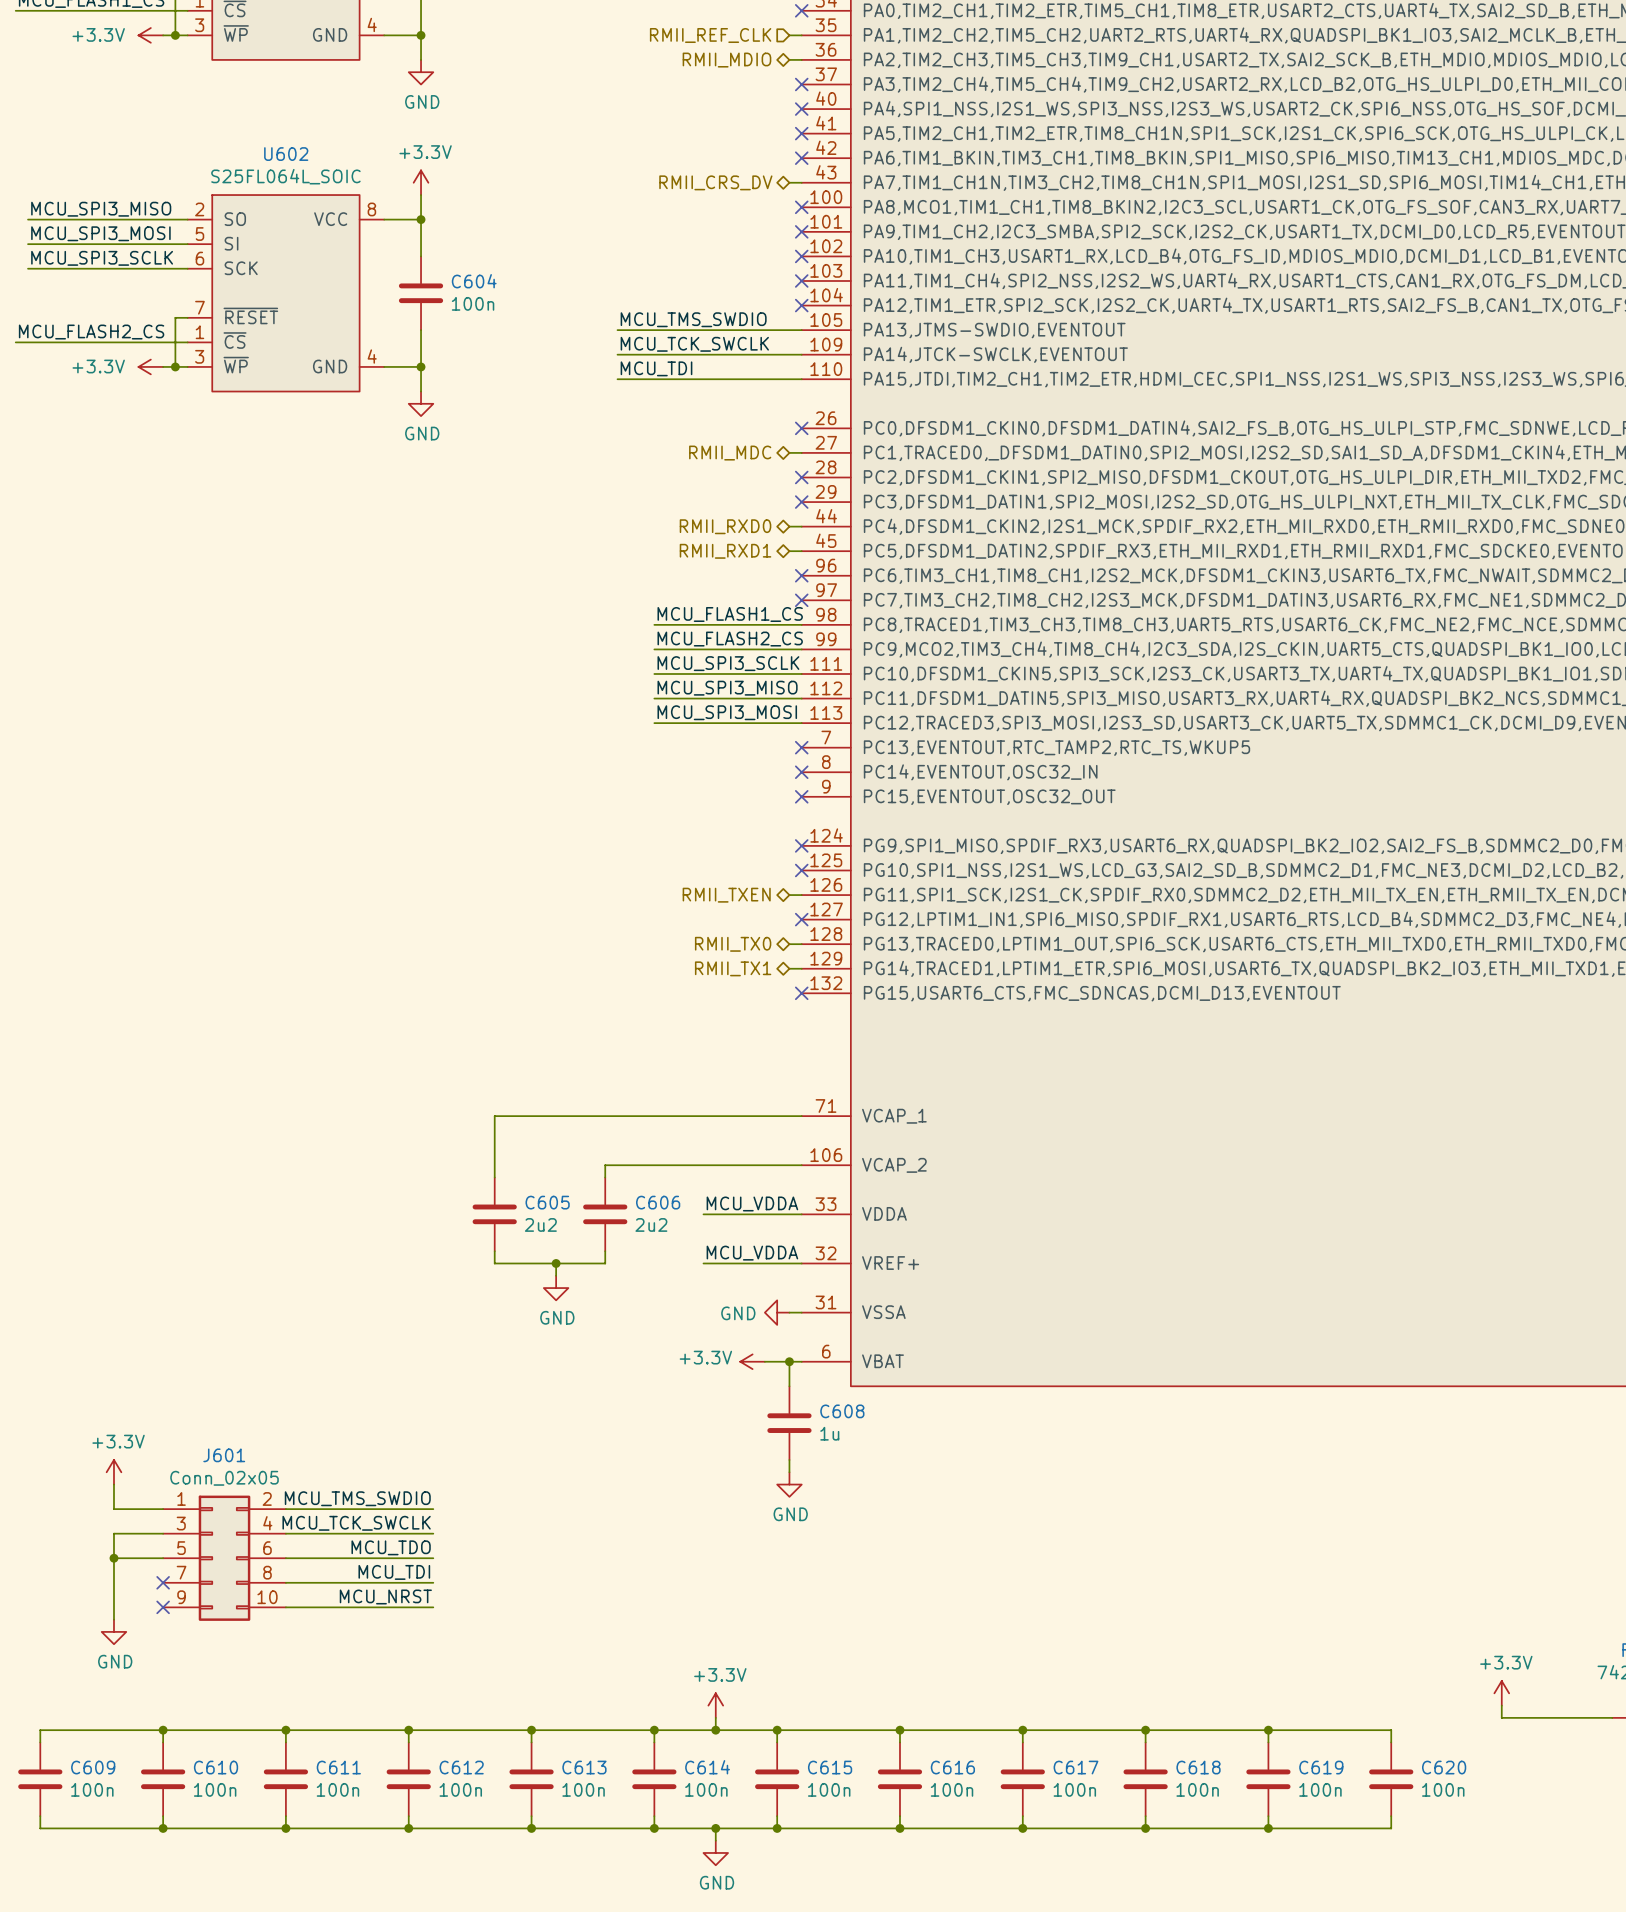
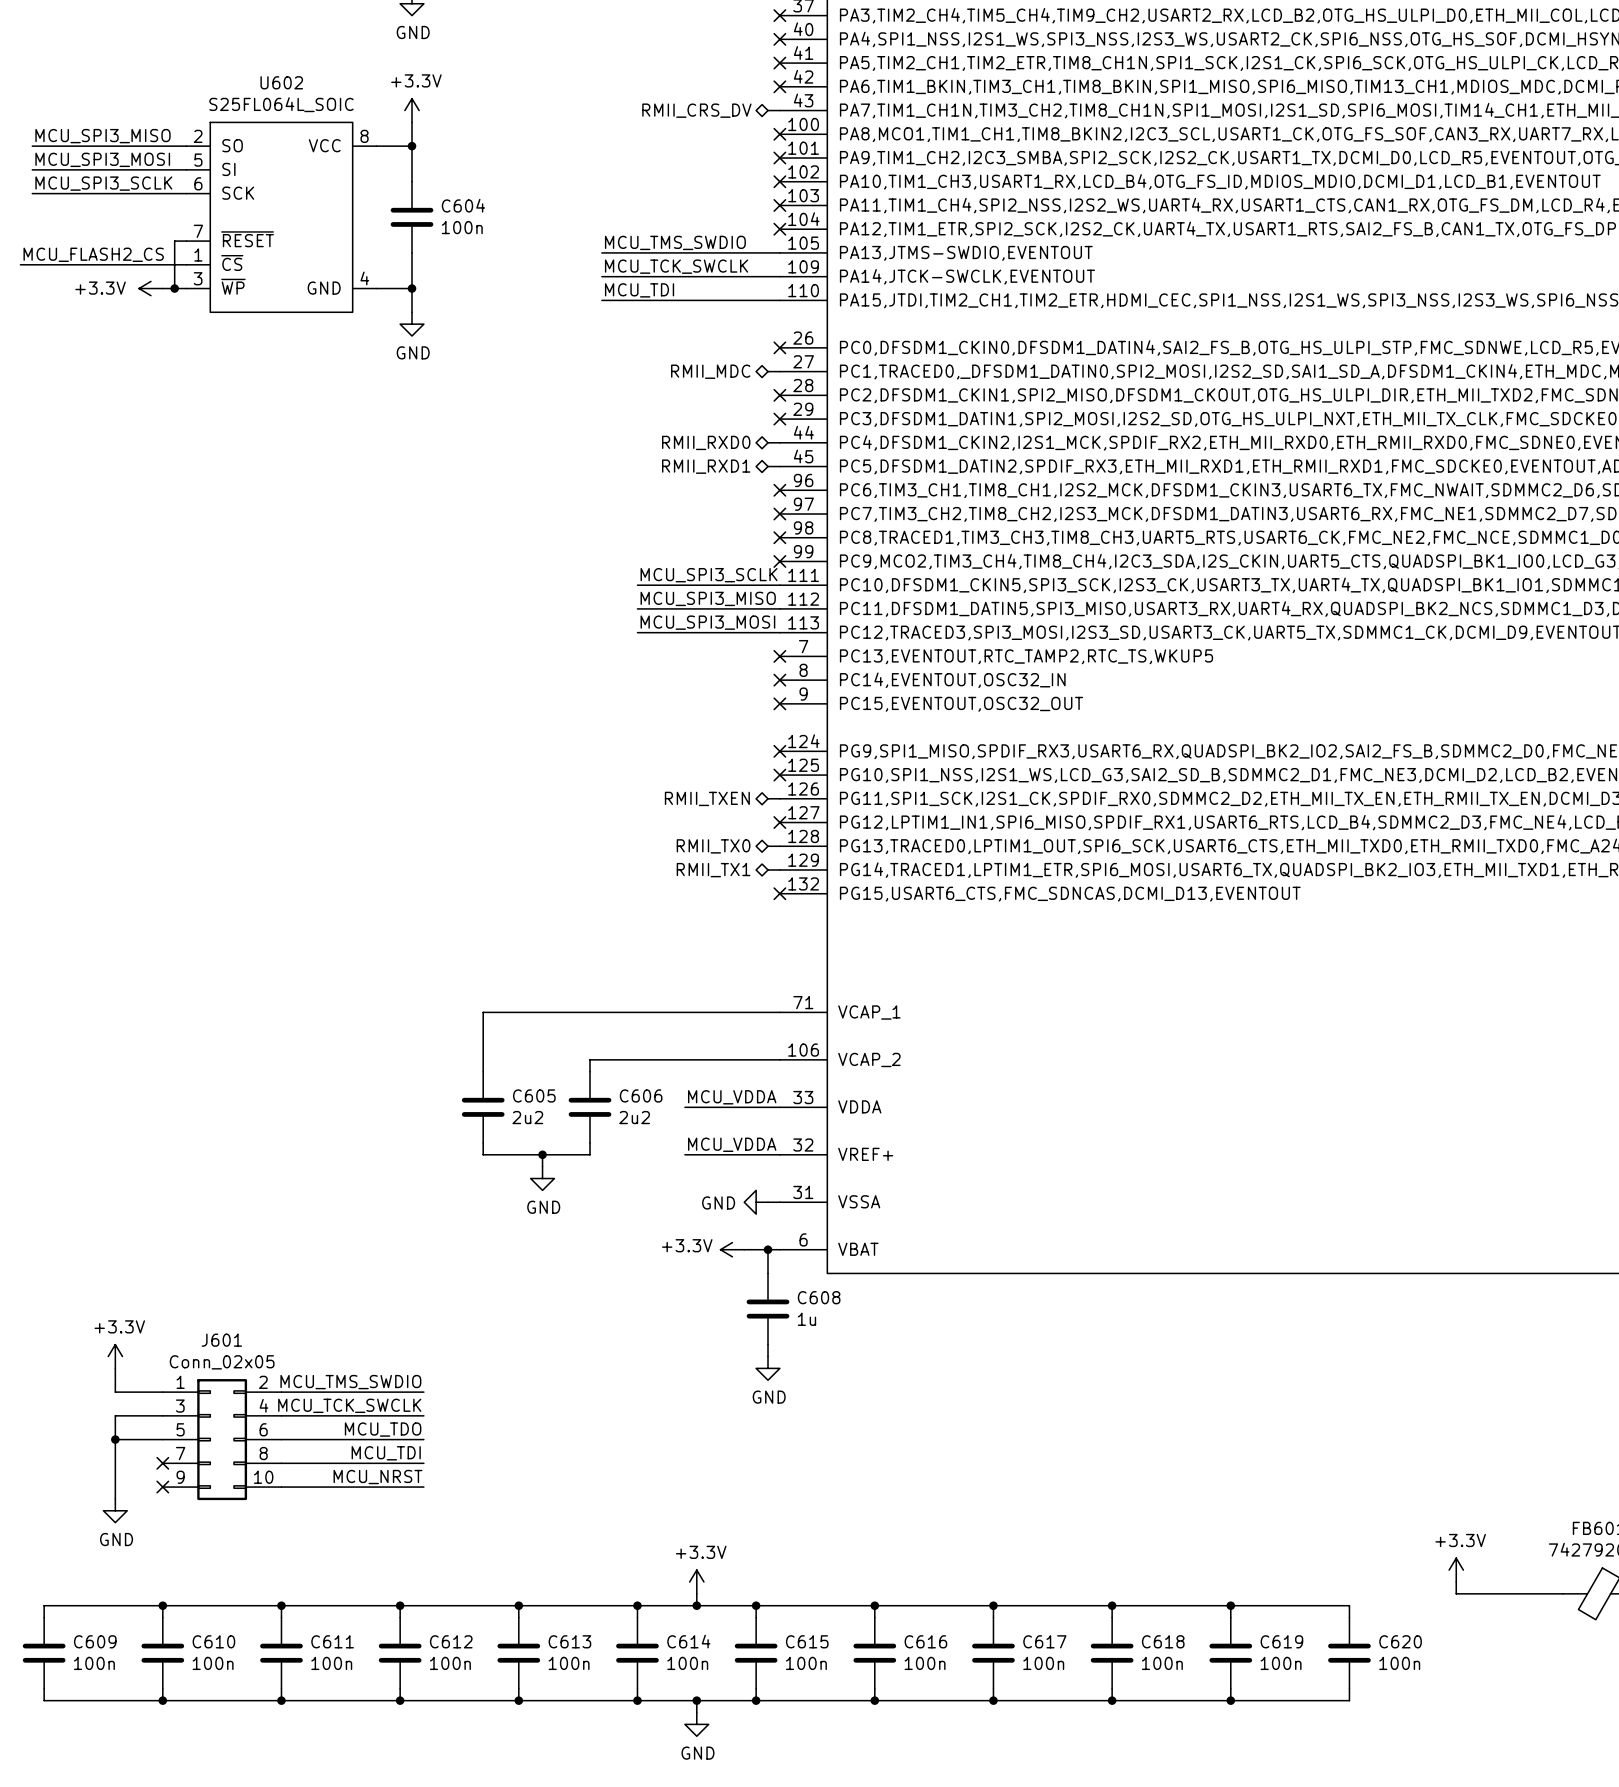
label: MCU_FLASH1_CS (730, 614) -> none
wire: (654, 624) (801, 624) -> none
no-connect mark: none -> (779, 537)
label: MCU_FLASH2_CS (730, 639) -> none
wire: (654, 649) (801, 649) -> none
no-connect mark: none -> (779, 561)

